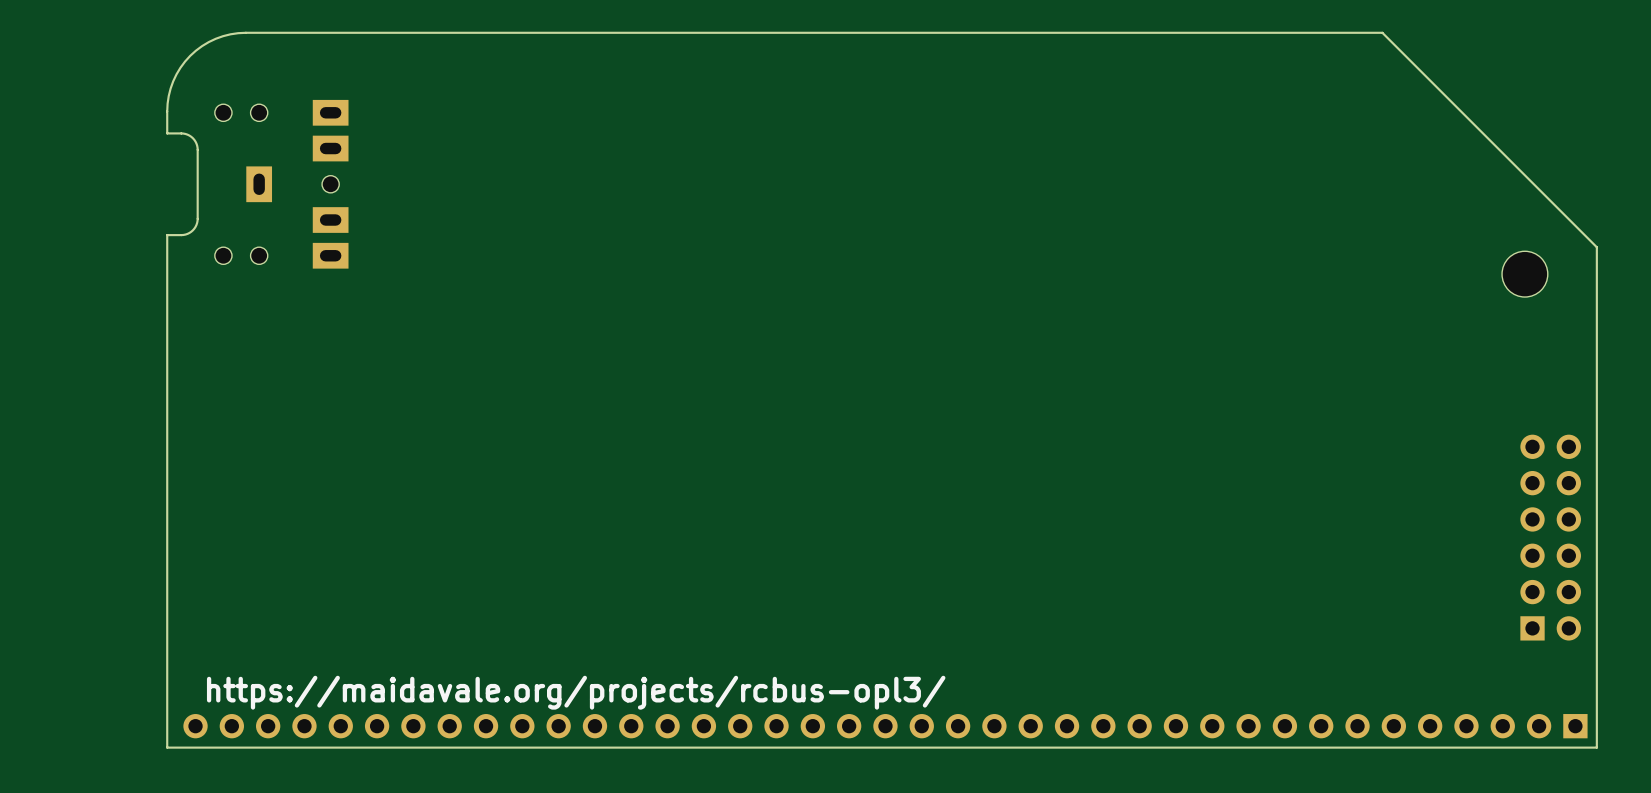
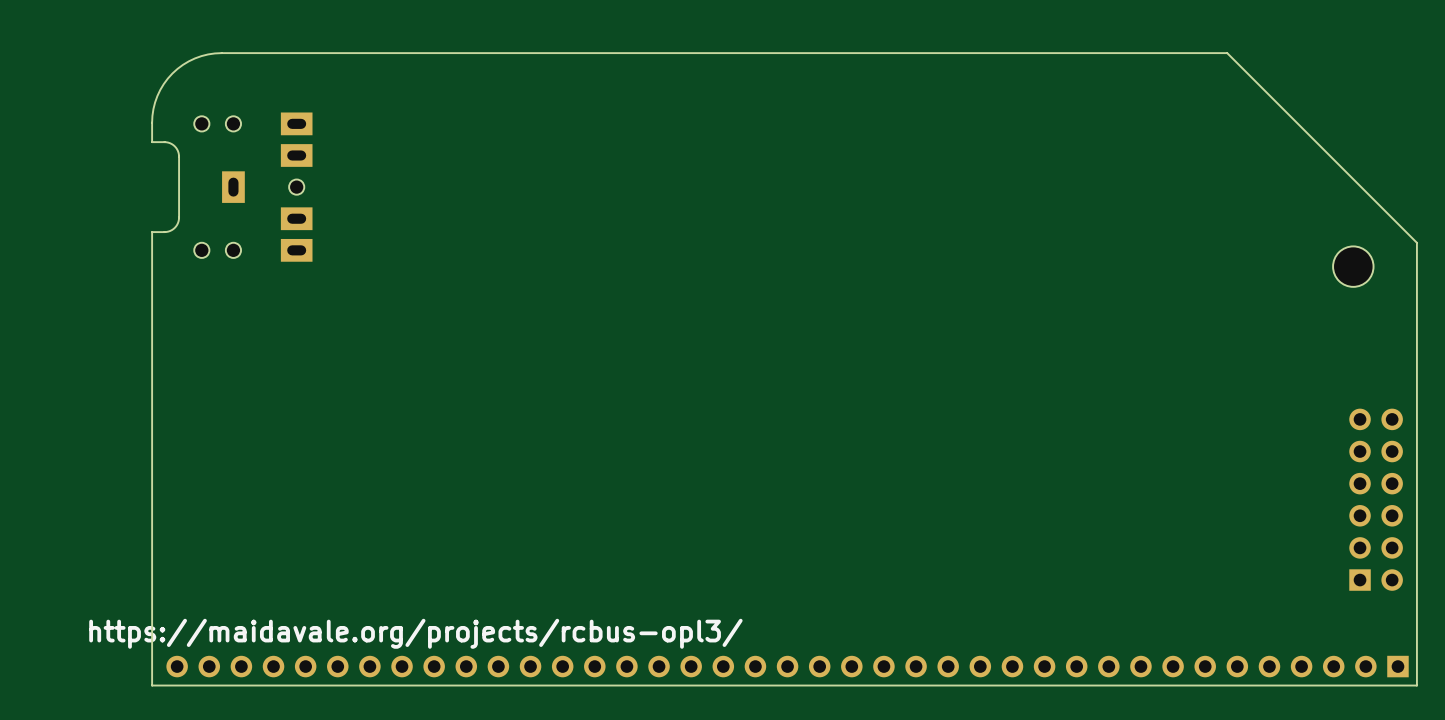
text position: https://maidavale.org/projects/rcbus-opl3/ (576, 692) -> https://maidavale.org/projects/rcbus-opl3/ (415, 633)

